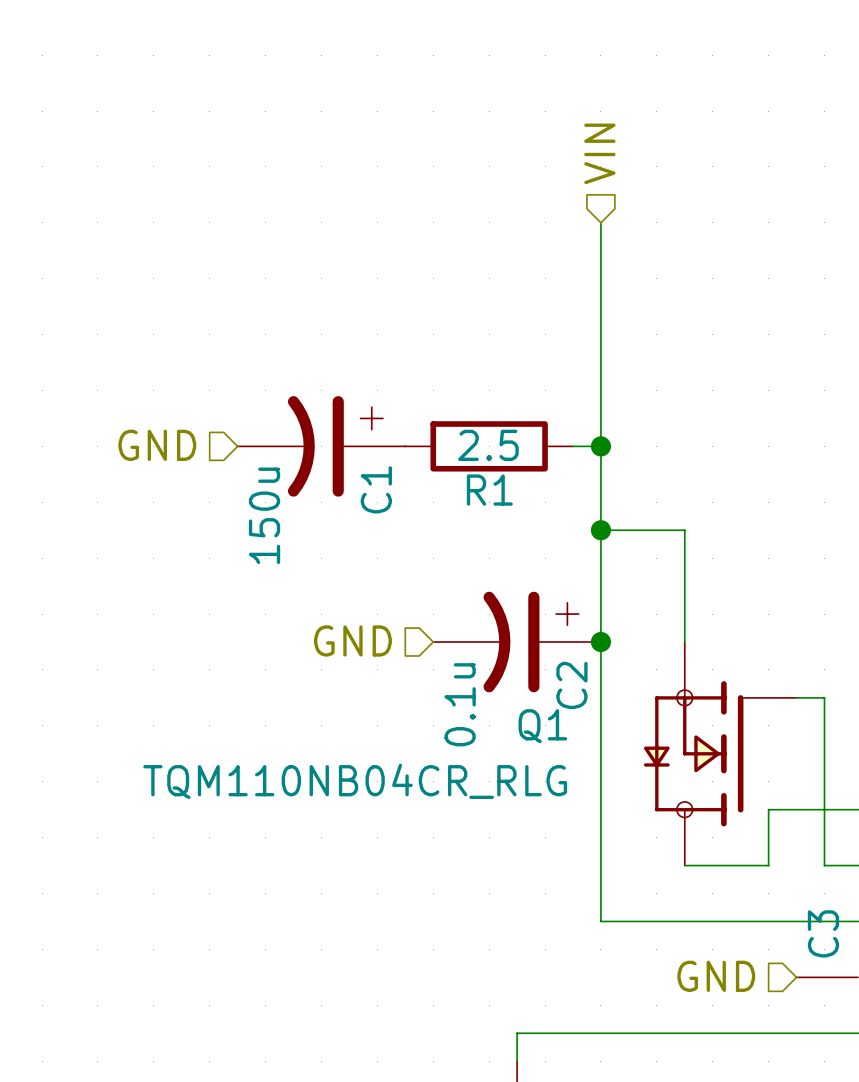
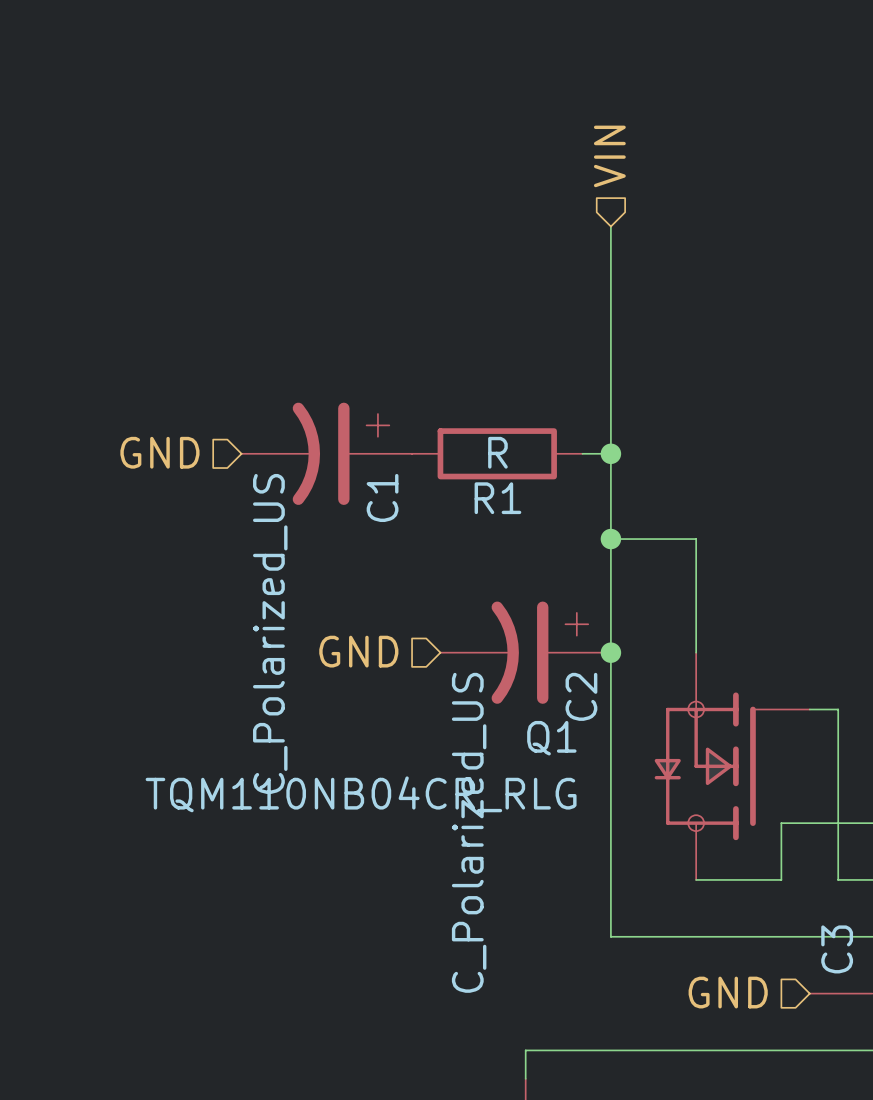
R1 value: 2.5 (488, 445) -> R (497, 452)
C1 value: 150u (264, 515) -> C_Polarized_US (270, 633)
C2 value: 0.1u (460, 704) -> C_Polarized_US (469, 832)

